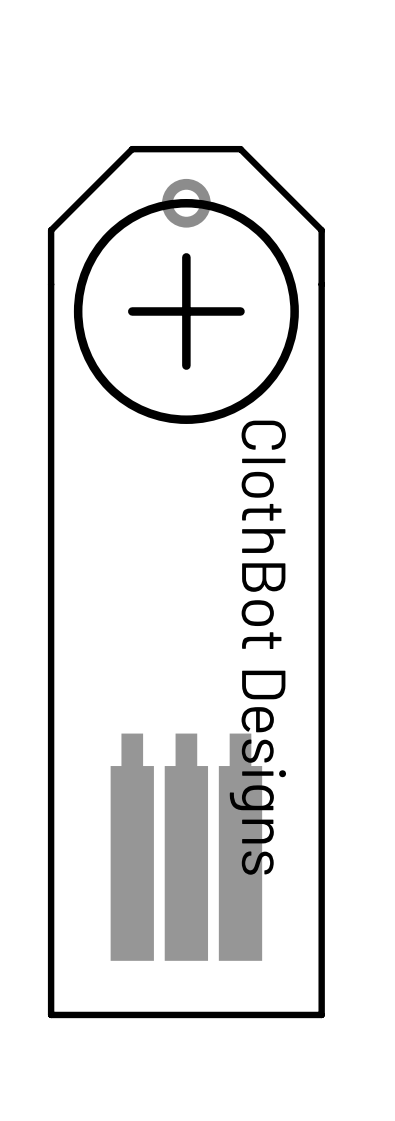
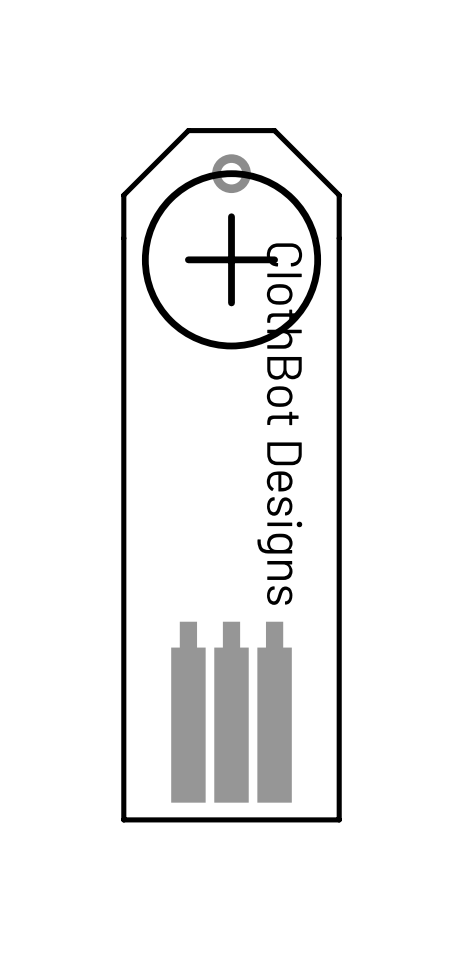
text position: ClothBot Designs (257, 647) -> ClothBot Designs (279, 424)
part: (132, 847) -> none
part: (186, 847) -> none
part: (240, 847) -> none
part: none -> (188, 712)
part: none -> (231, 712)
part: none -> (274, 712)

